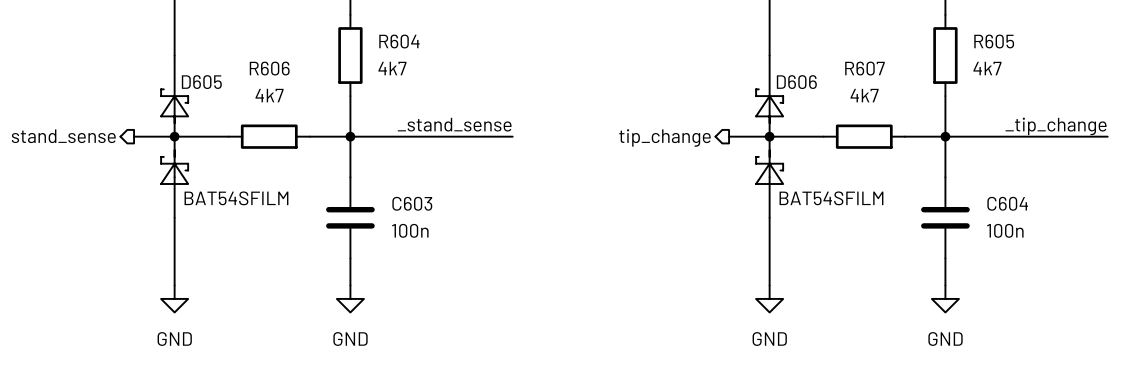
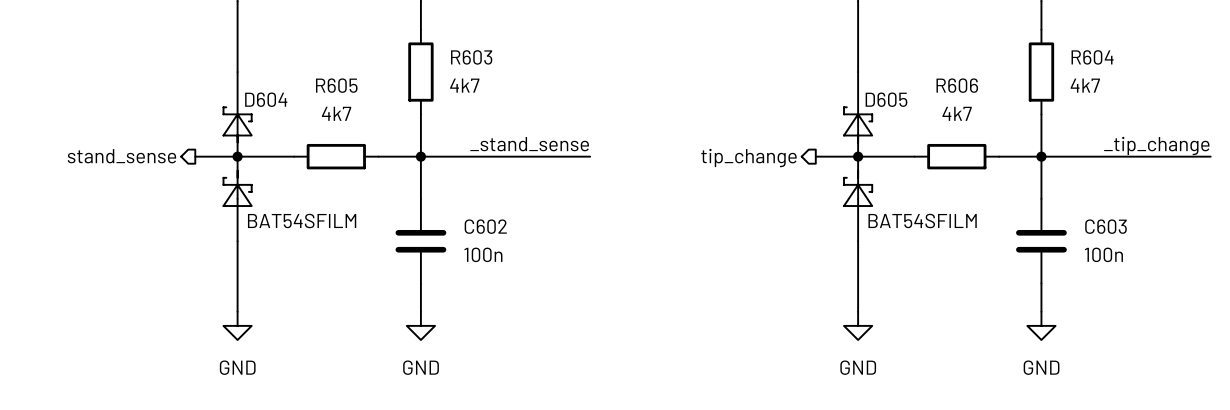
R604 name: R604 (399, 41) -> R603 (471, 57)
R605 name: R605 (994, 41) -> R604 (1092, 57)
R606 name: R606 (269, 68) -> R605 (336, 85)
R607 name: R607 (864, 68) -> R606 (957, 85)
D605 name: D605 (201, 82) -> D604 (266, 99)
D606 name: D606 (796, 82) -> D605 (886, 99)
C603 name: C603 (412, 203) -> C602 (485, 226)
C604 name: C604 (1007, 203) -> C603 (1106, 226)

